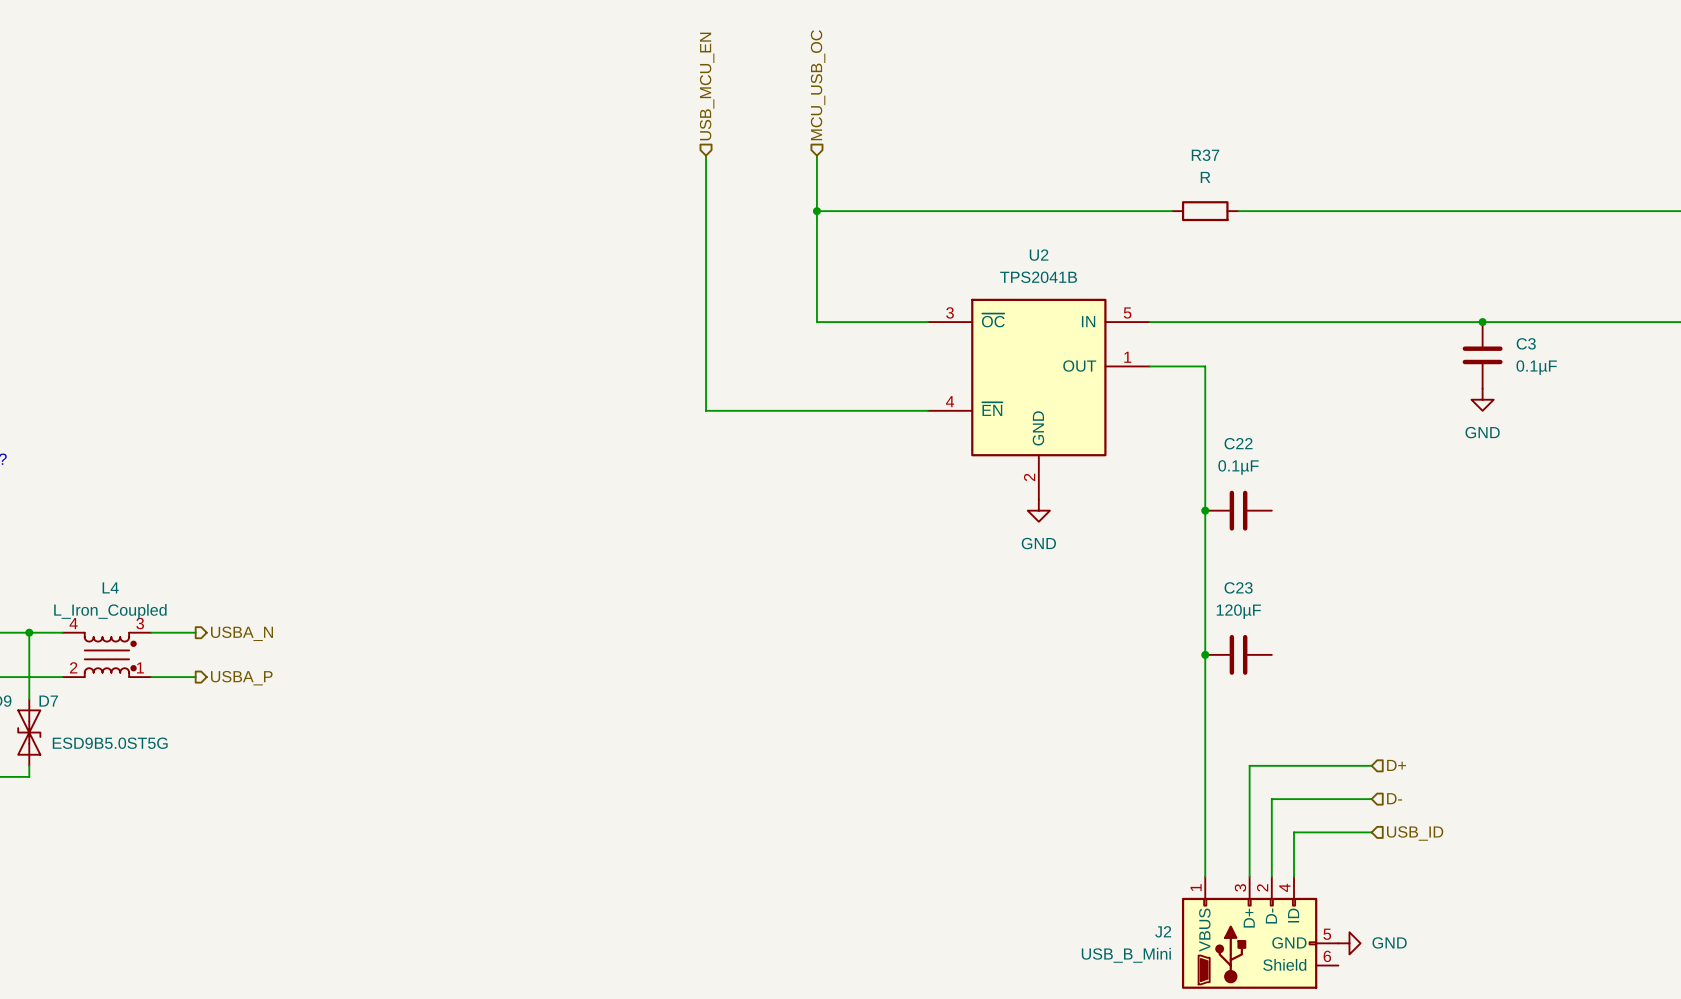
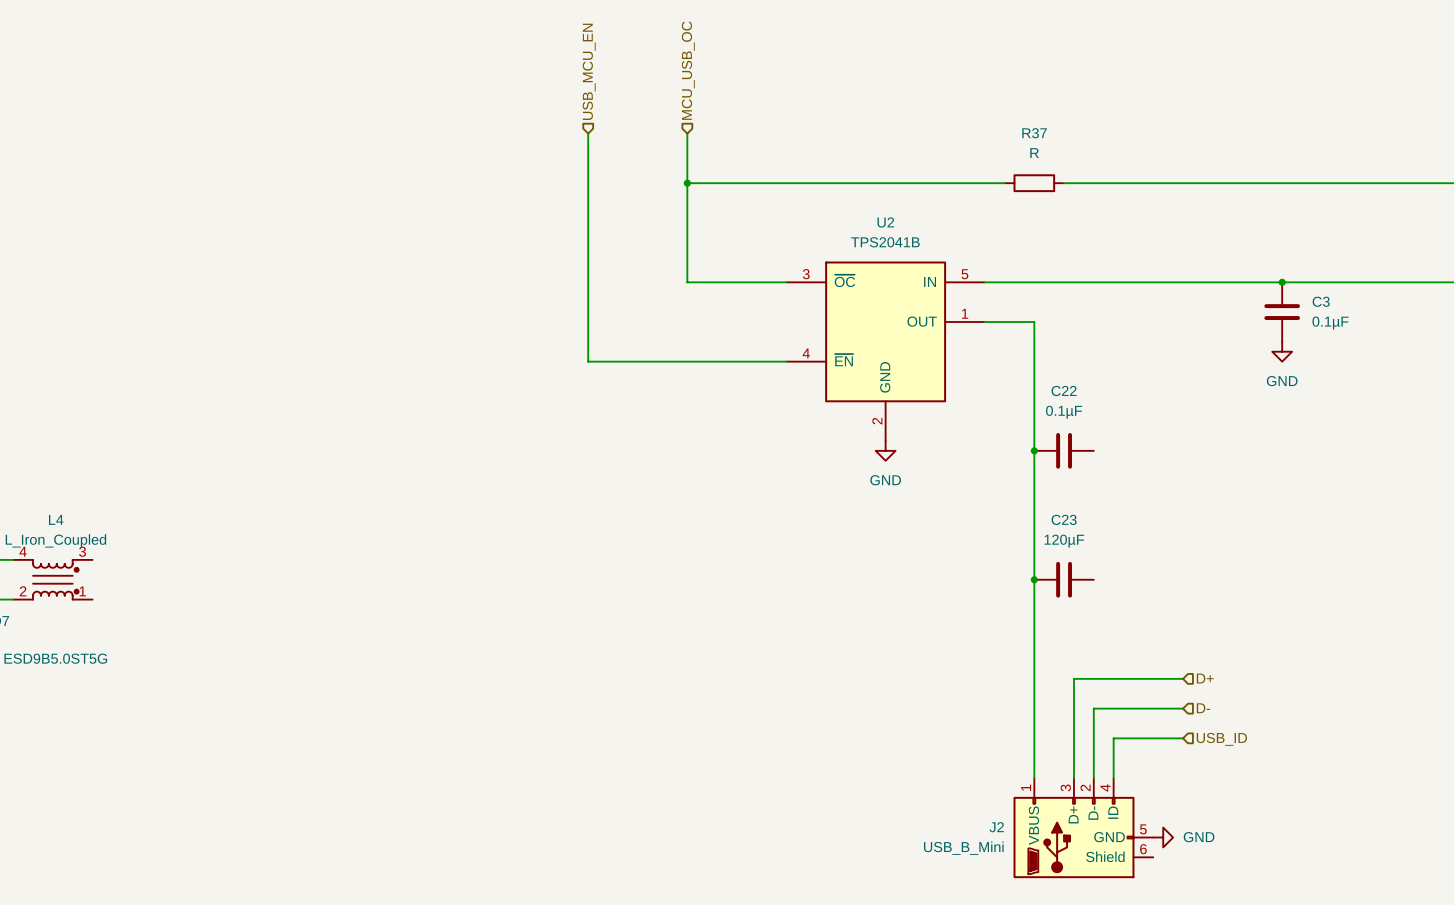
wire: (151, 632) (195, 632) -> none
hierarchical label: USBA_N (242, 633) -> none
wire: (151, 677) (195, 677) -> none
hierarchical label: USBA_P (241, 678) -> none

